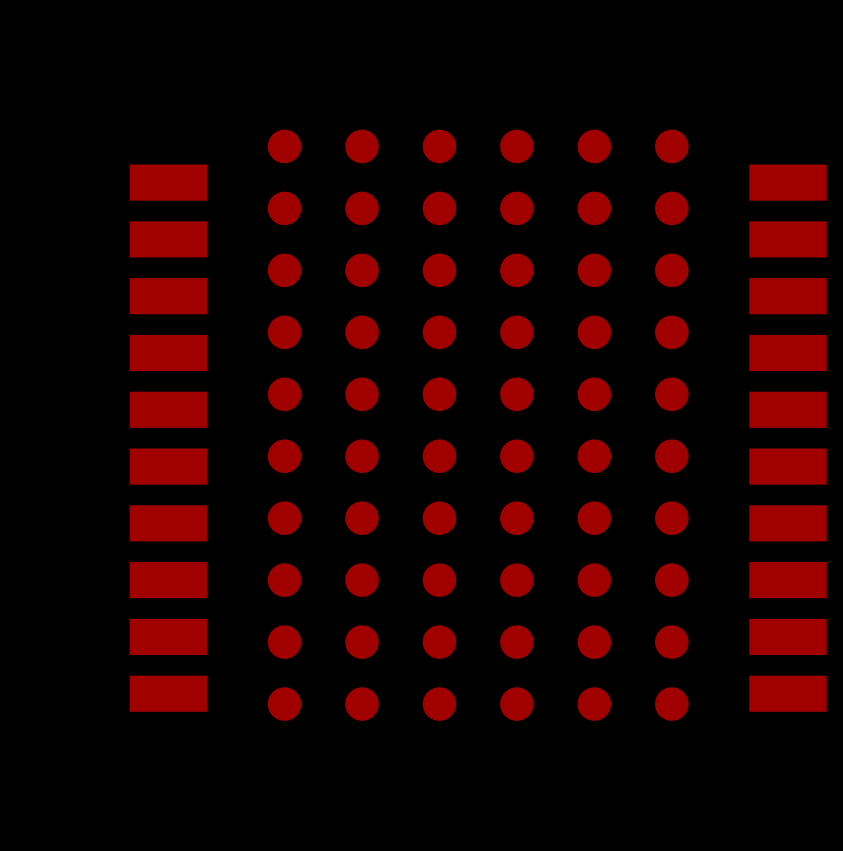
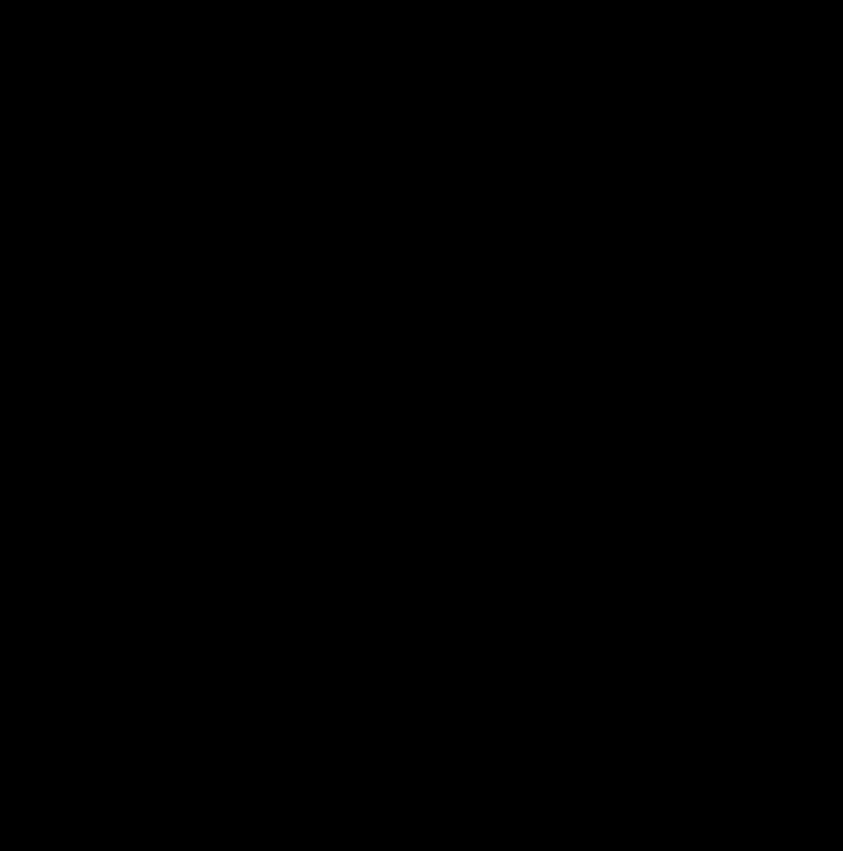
part: (478, 425) -> none

